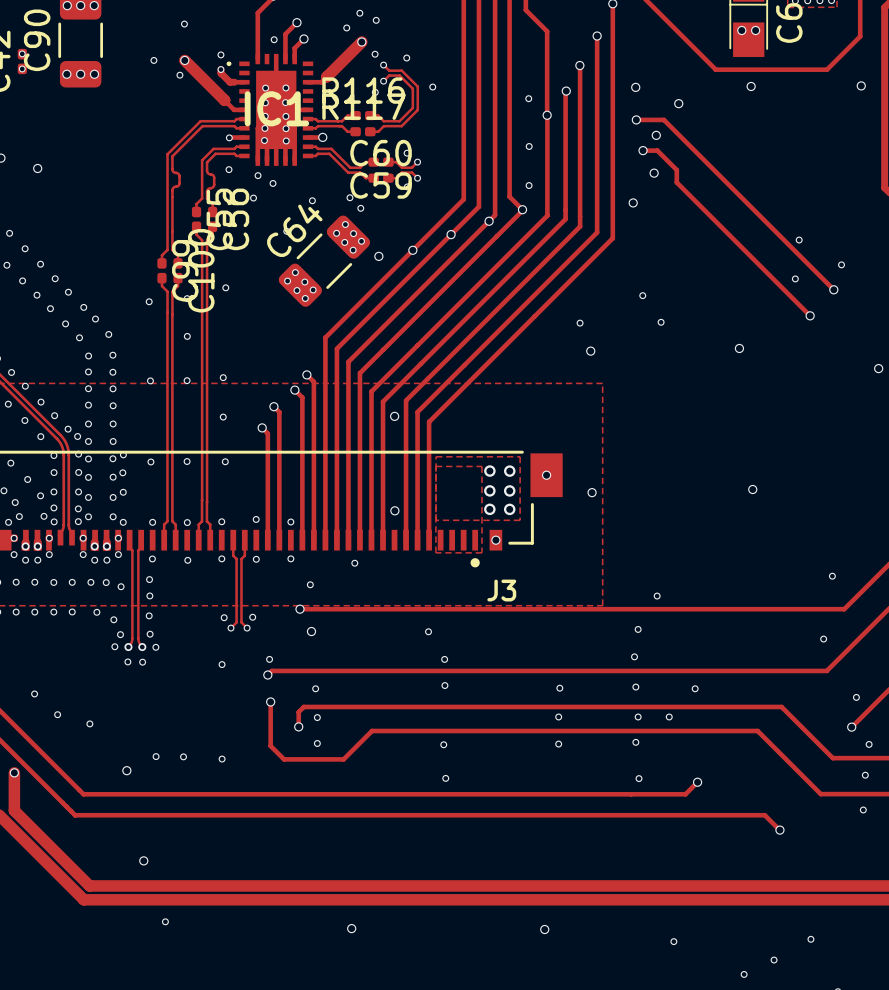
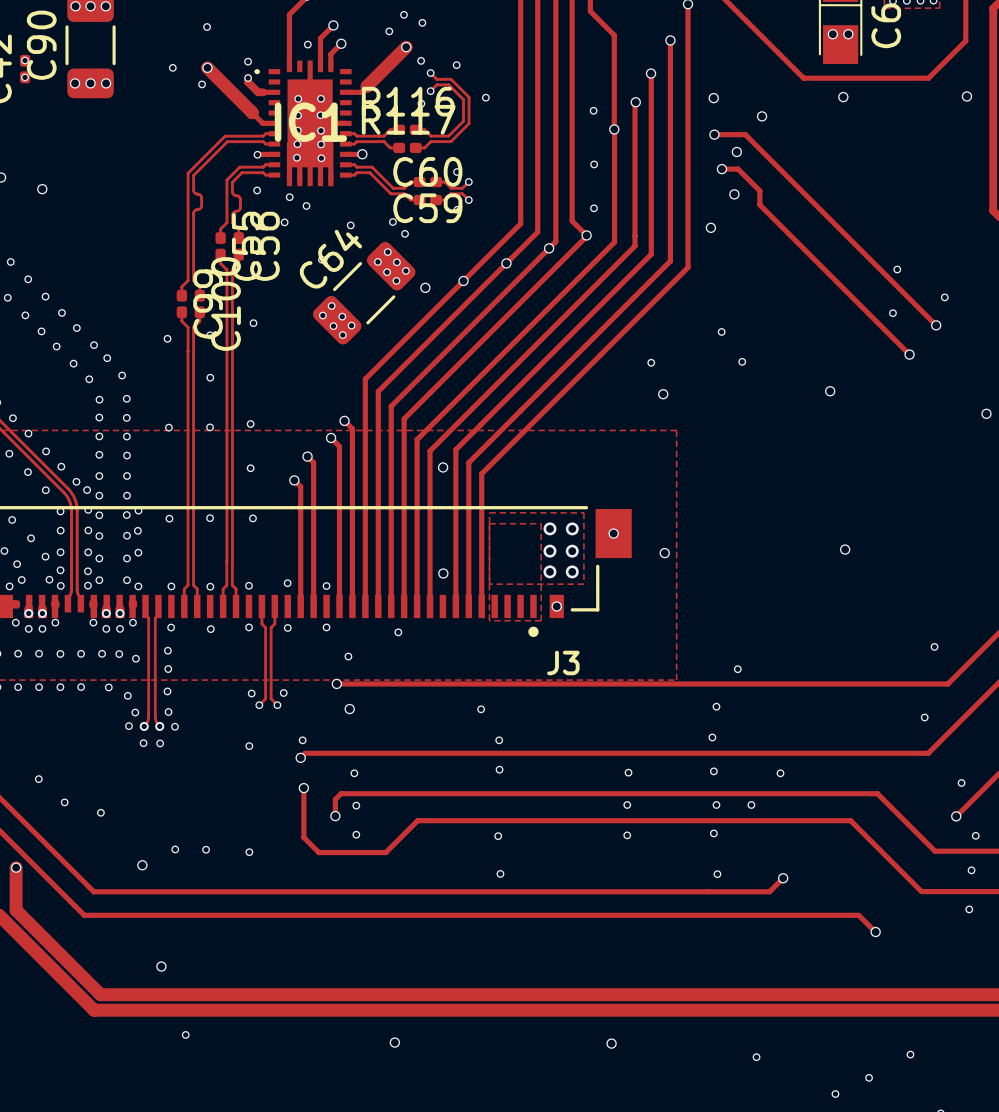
via: (14, 538) -> none
via: (49, 538) -> none
via: (83, 538) -> none
via: (118, 538) -> none

